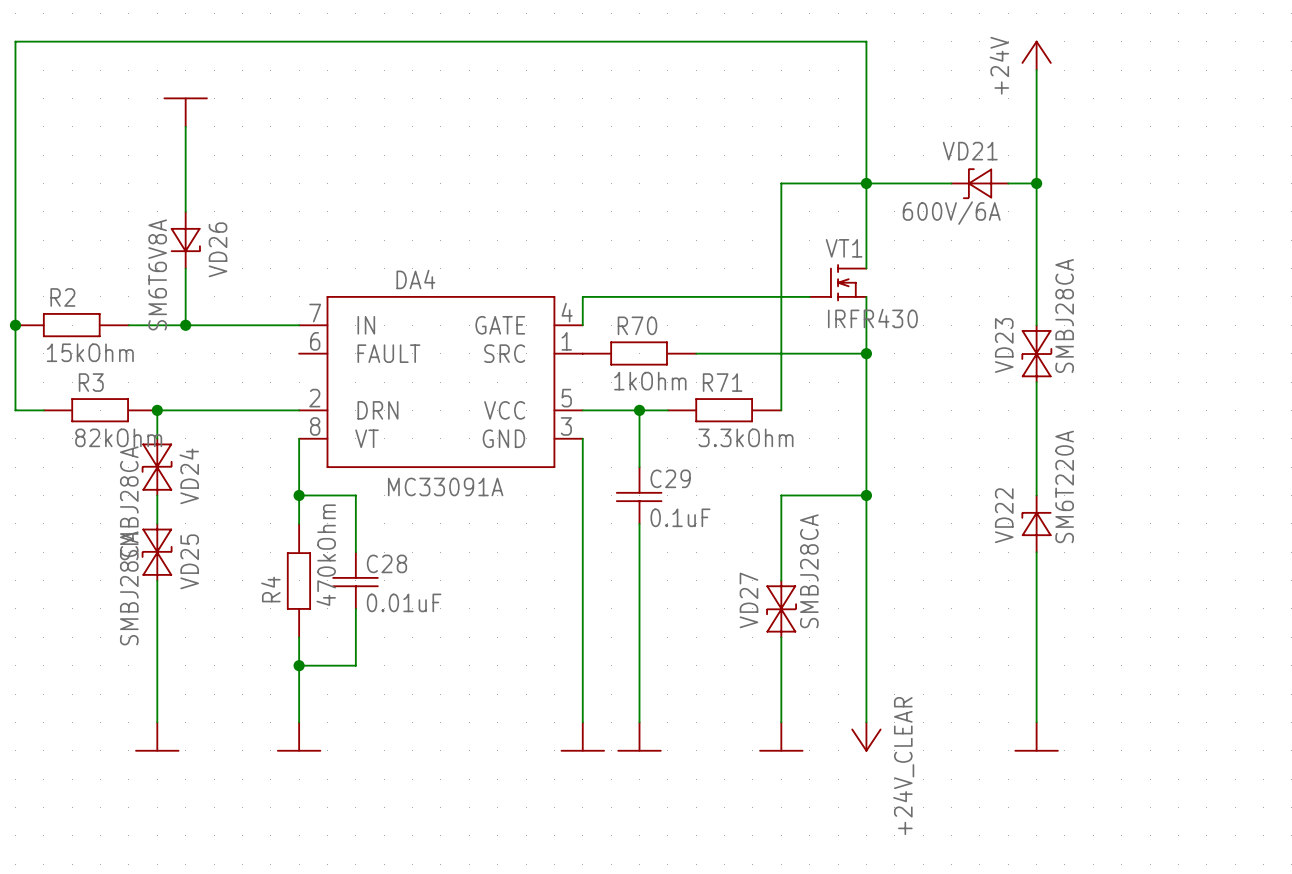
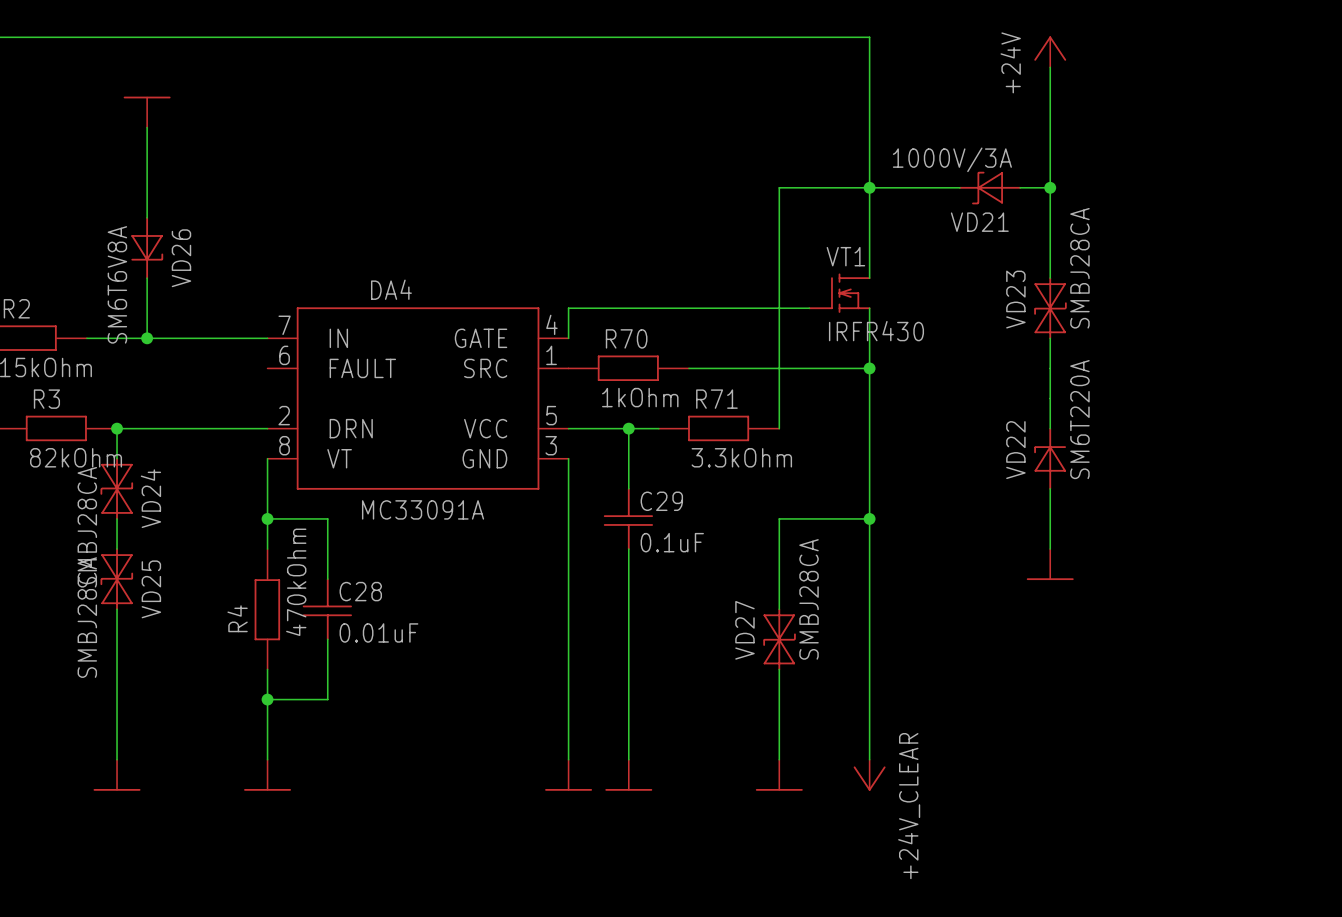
VD21 name position: VD21 (970, 151) -> VD21 (979, 222)
VD21 value: 600V/6A (951, 213) -> 1000V/3A (952, 159)
VD23 position: (1036, 353) -> (1050, 308)
VD22 position: (1036, 523) -> (1050, 458)
wire: (1036, 552) (1036, 722) -> none
power symbol position: (1036, 737) -> (1050, 564)

